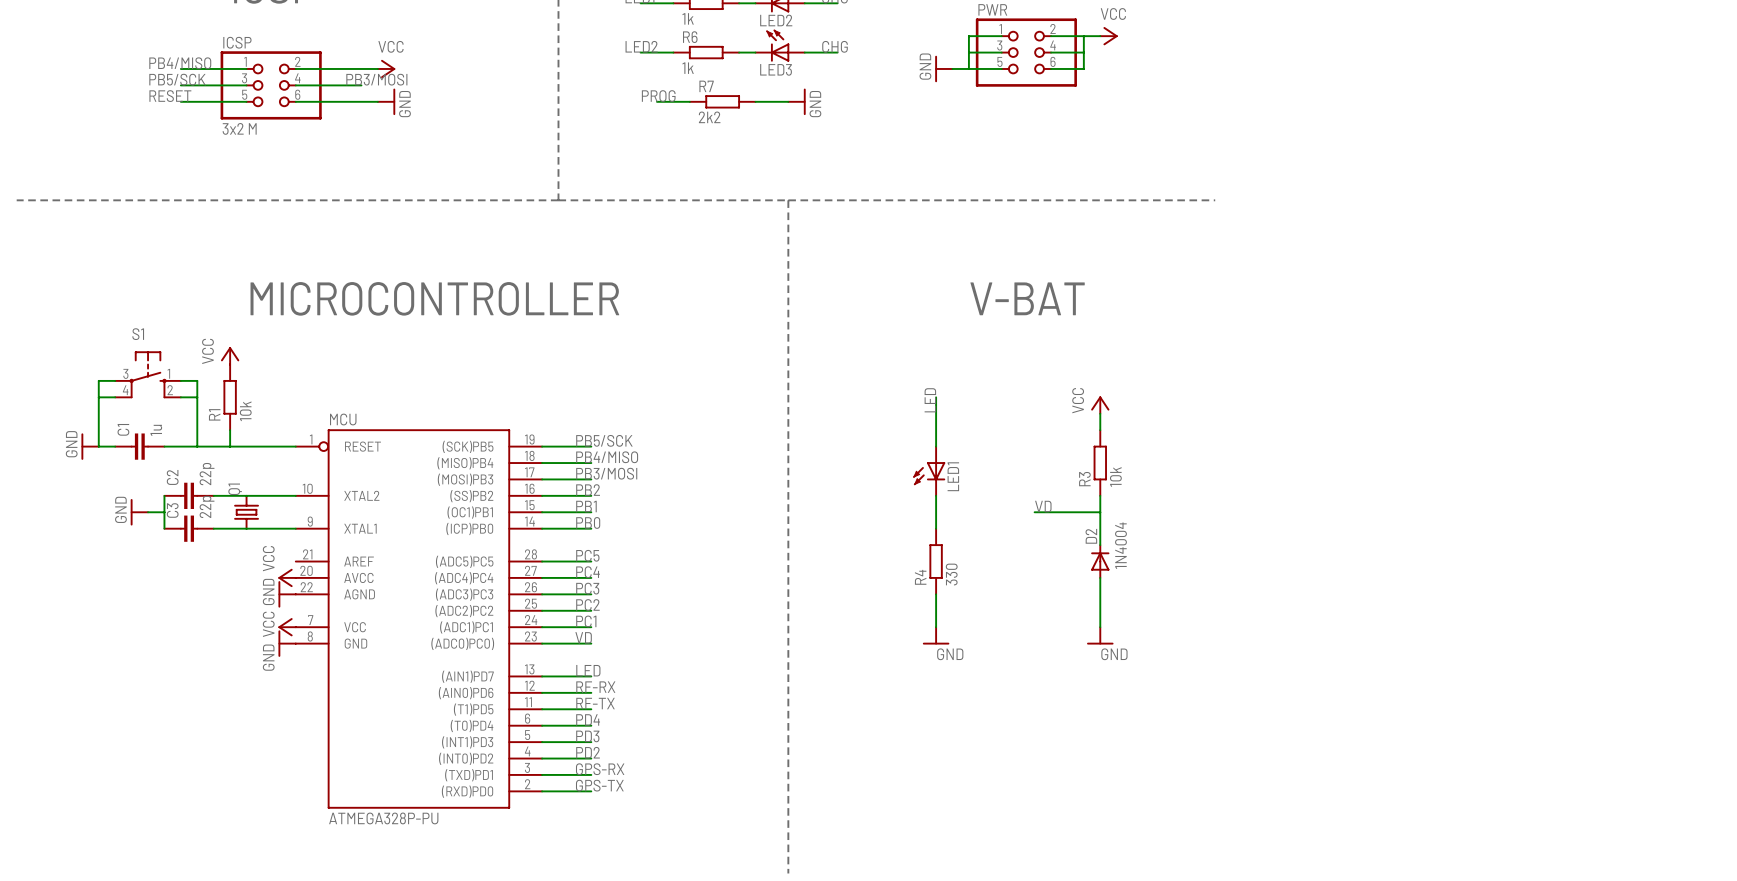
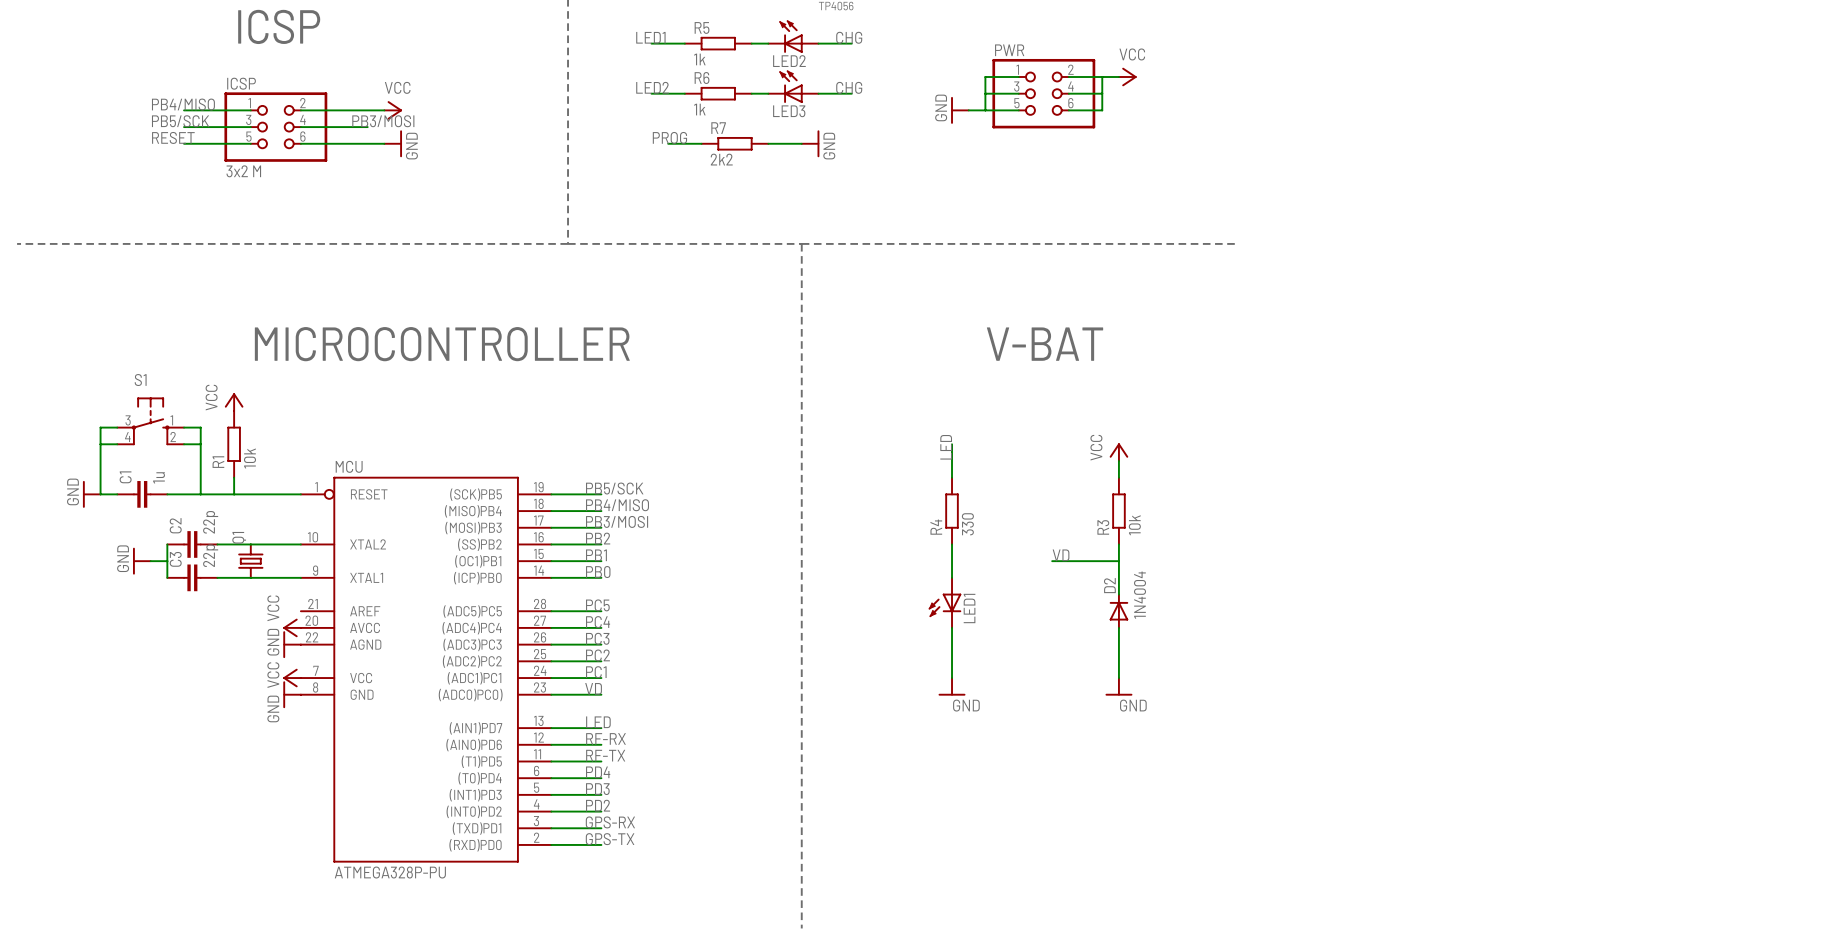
LED1 position: (929, 471) -> (945, 602)
R4 position: (936, 561) -> (952, 511)

